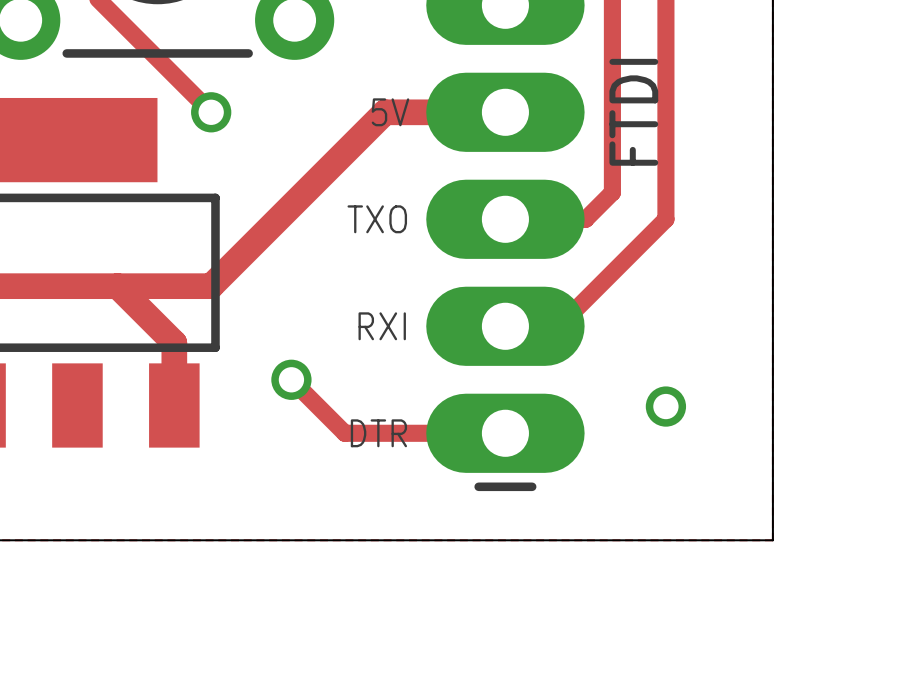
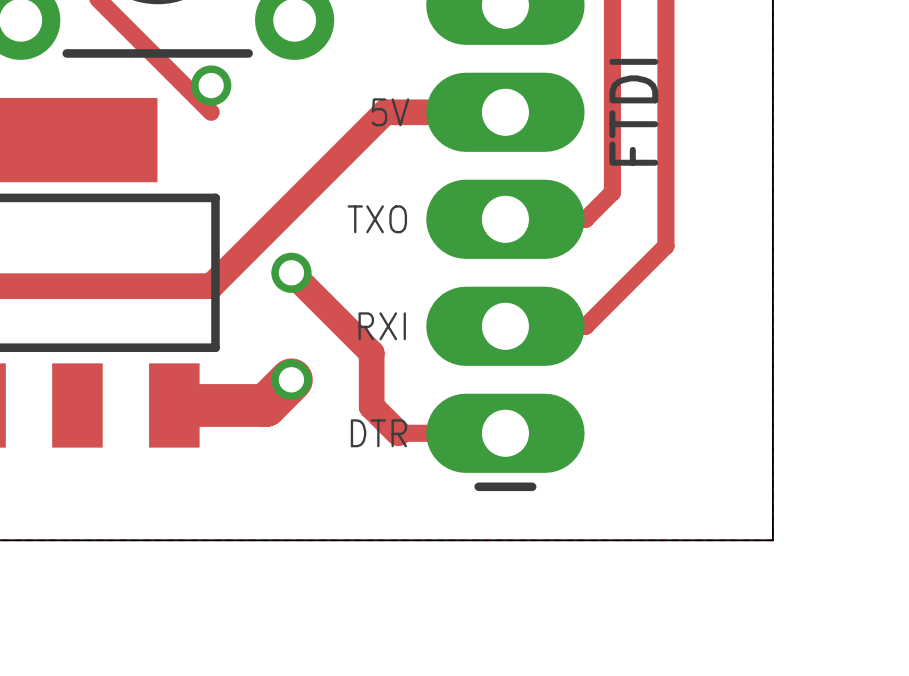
via position: (211, 112) -> (211, 85)
track: (665, 219) (558, 326) -> (665, 219) (665, 246) (585, 326) (558, 326)
via: none -> (291, 272)
track: (117, 286) (174, 342) (174, 405) -> (291, 379) (265, 405) (174, 405)
track: (291, 379) (344, 433) (398, 433) -> (291, 272) (371, 353) (371, 406) (398, 433)
via: (665, 406) -> none

